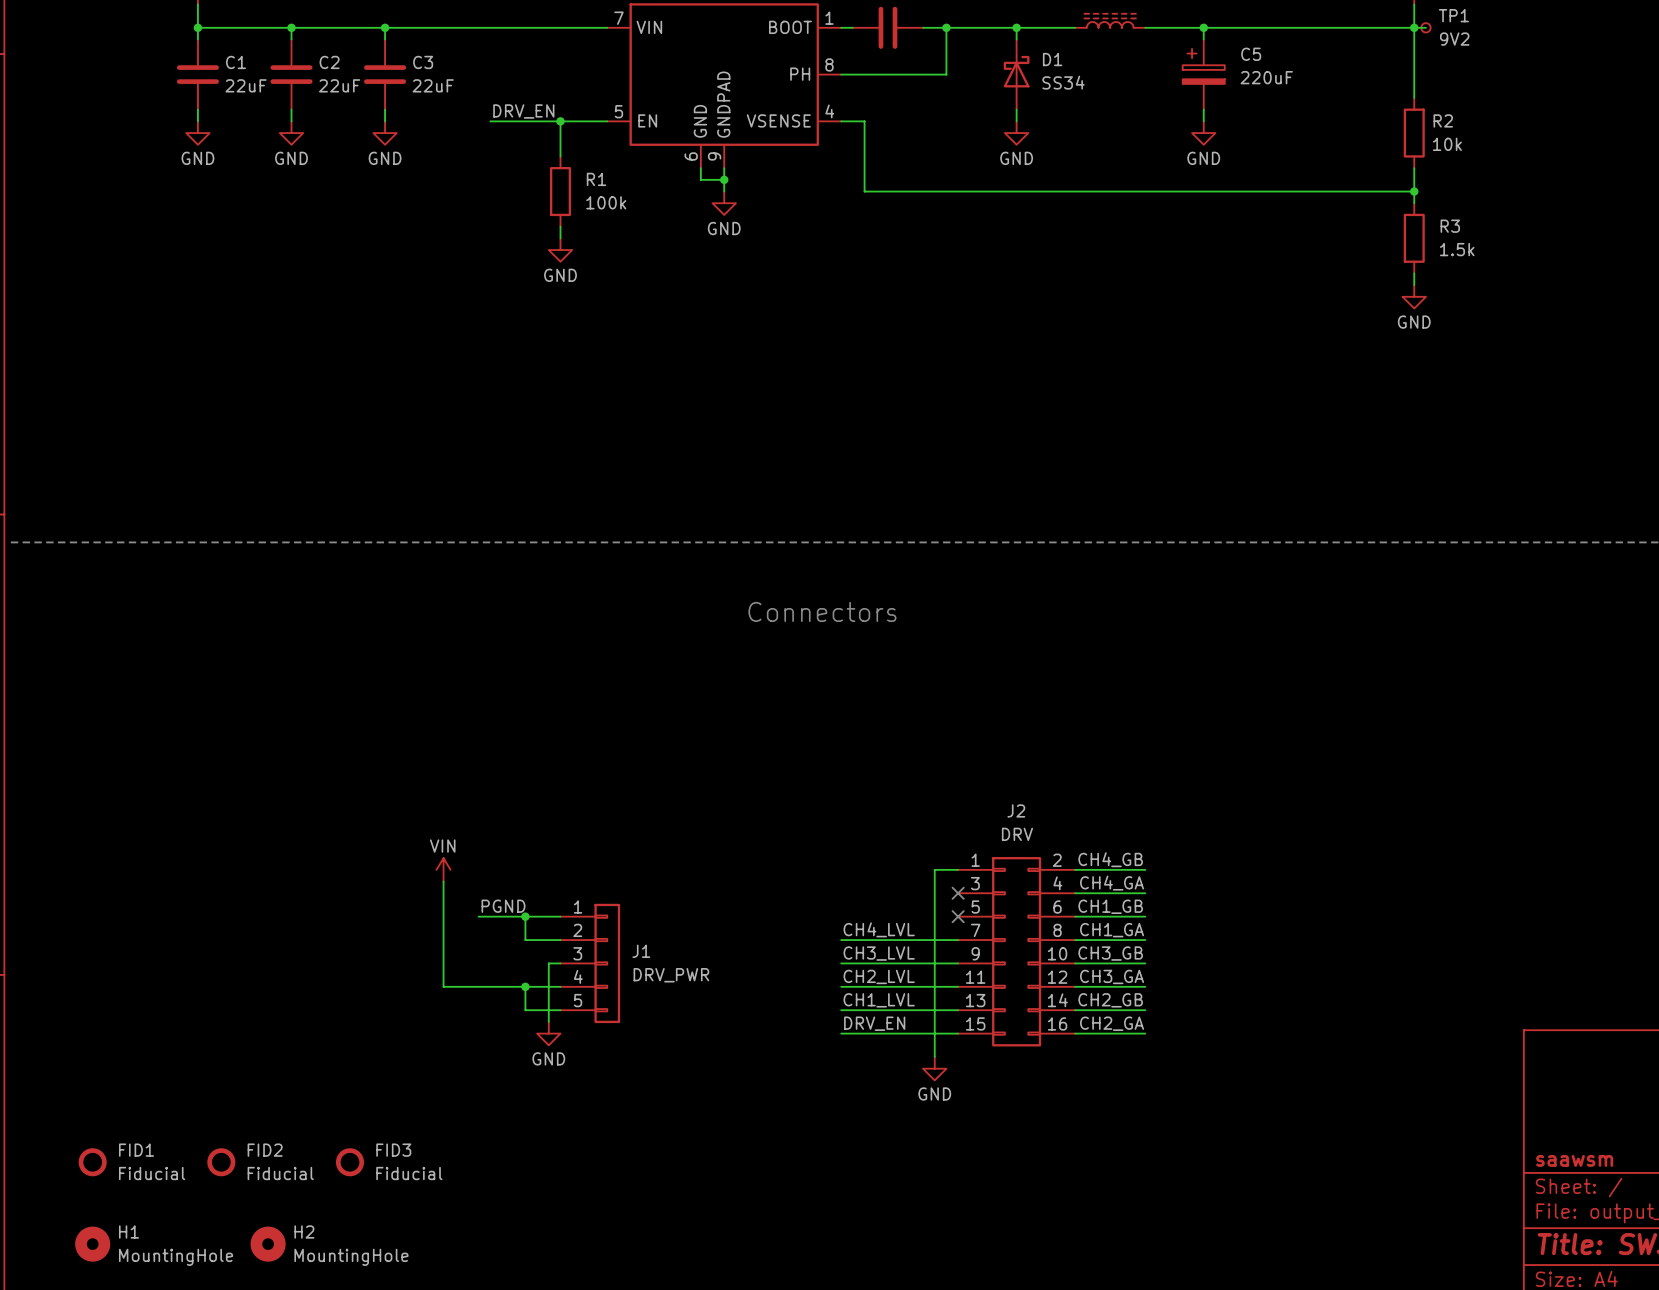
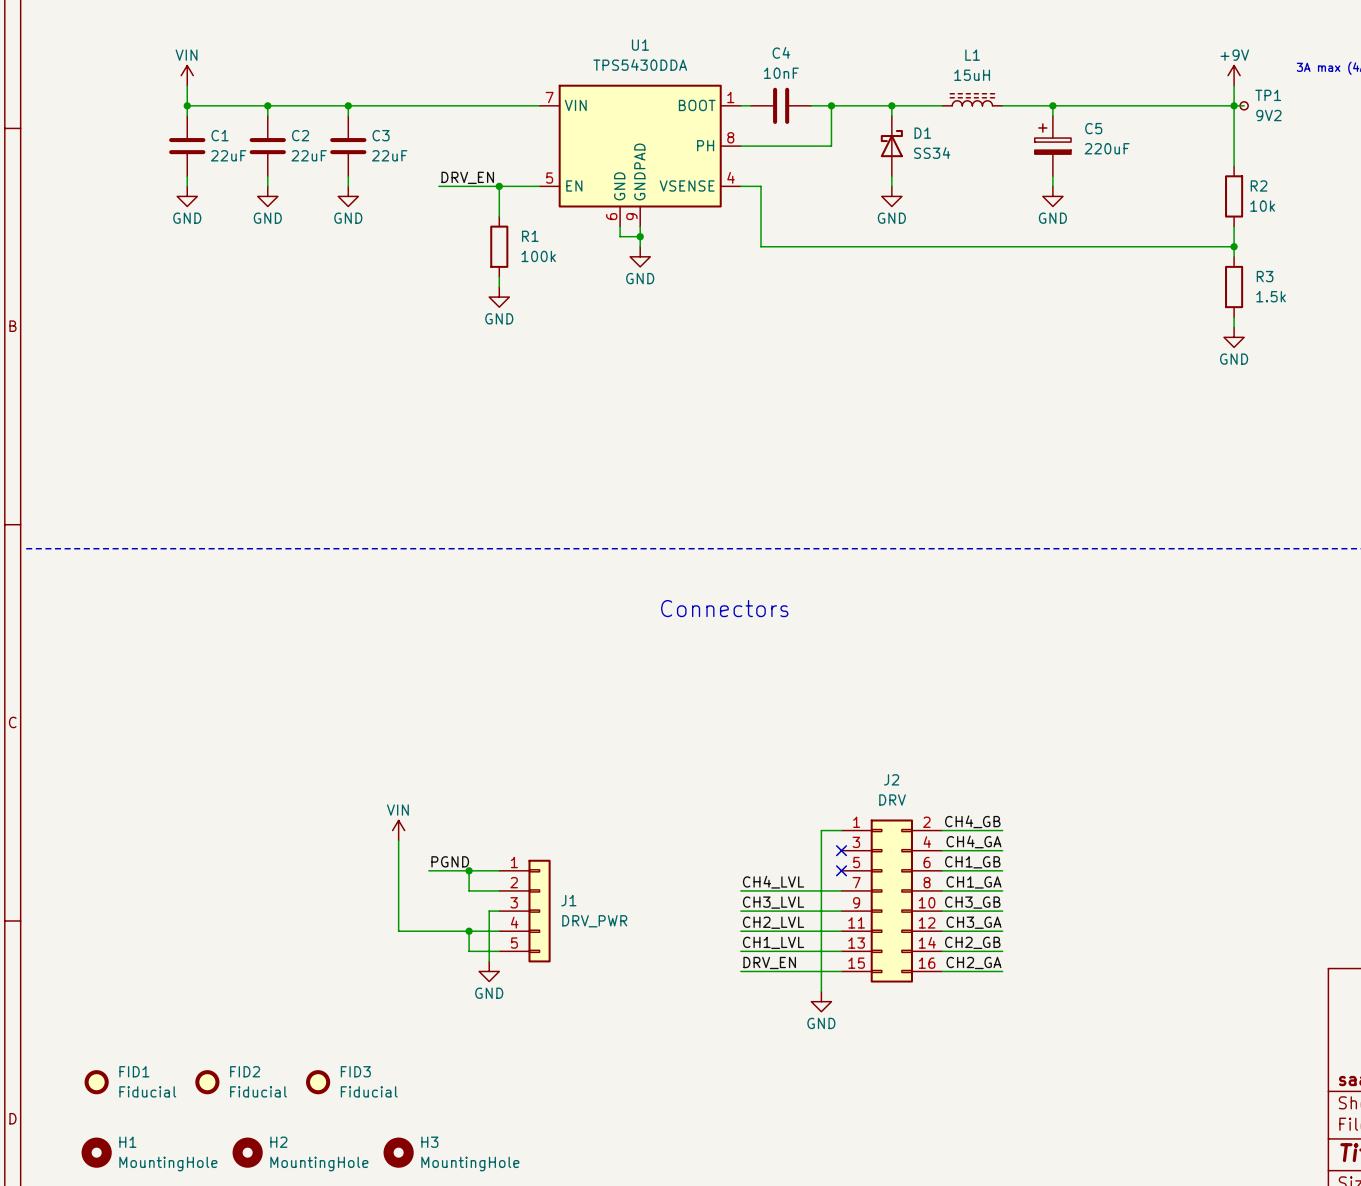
H3: none -> MountingHole (398, 1152)

